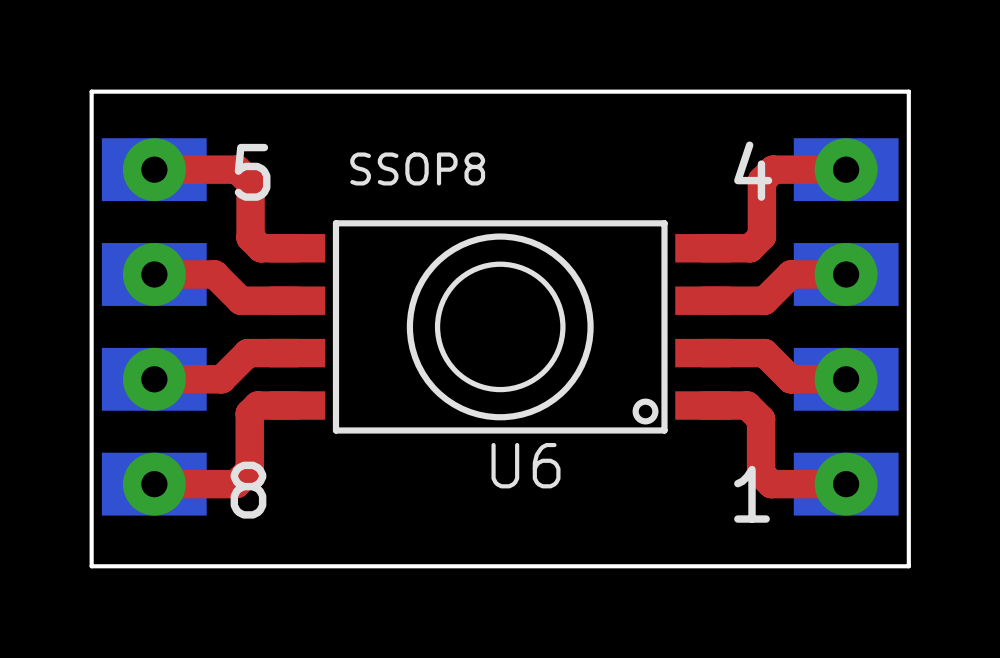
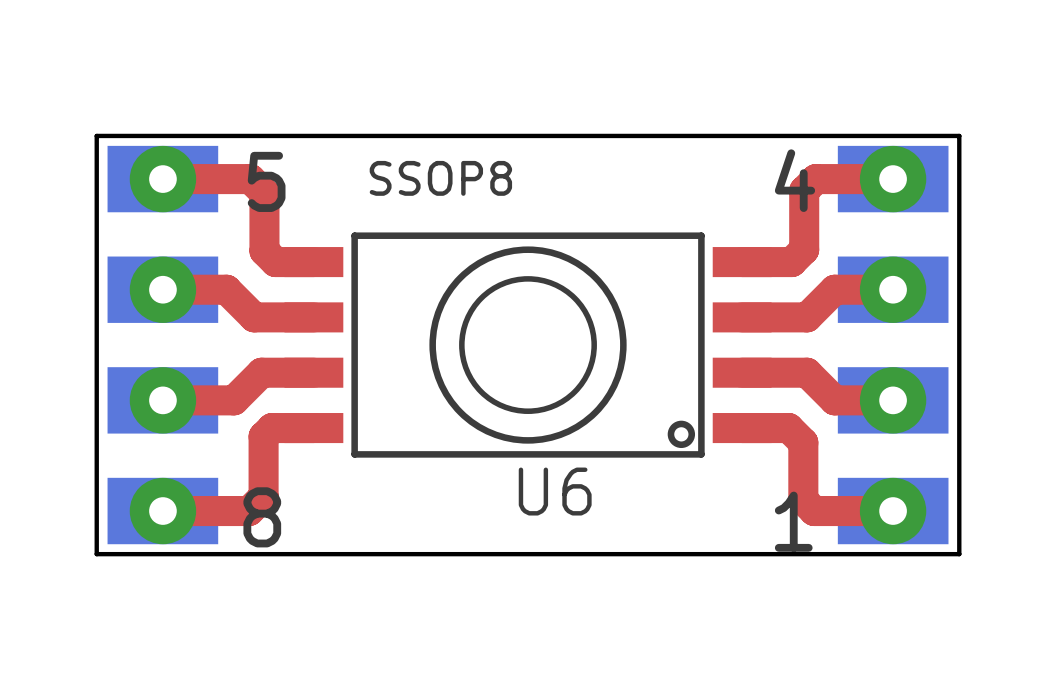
board edge: (91, 128) (91, 91) (908, 91) (908, 128) -> (96, 135) (959, 135)
board edge: (91, 525) (91, 566) (908, 566) (908, 525) -> (96, 554) (959, 554)

